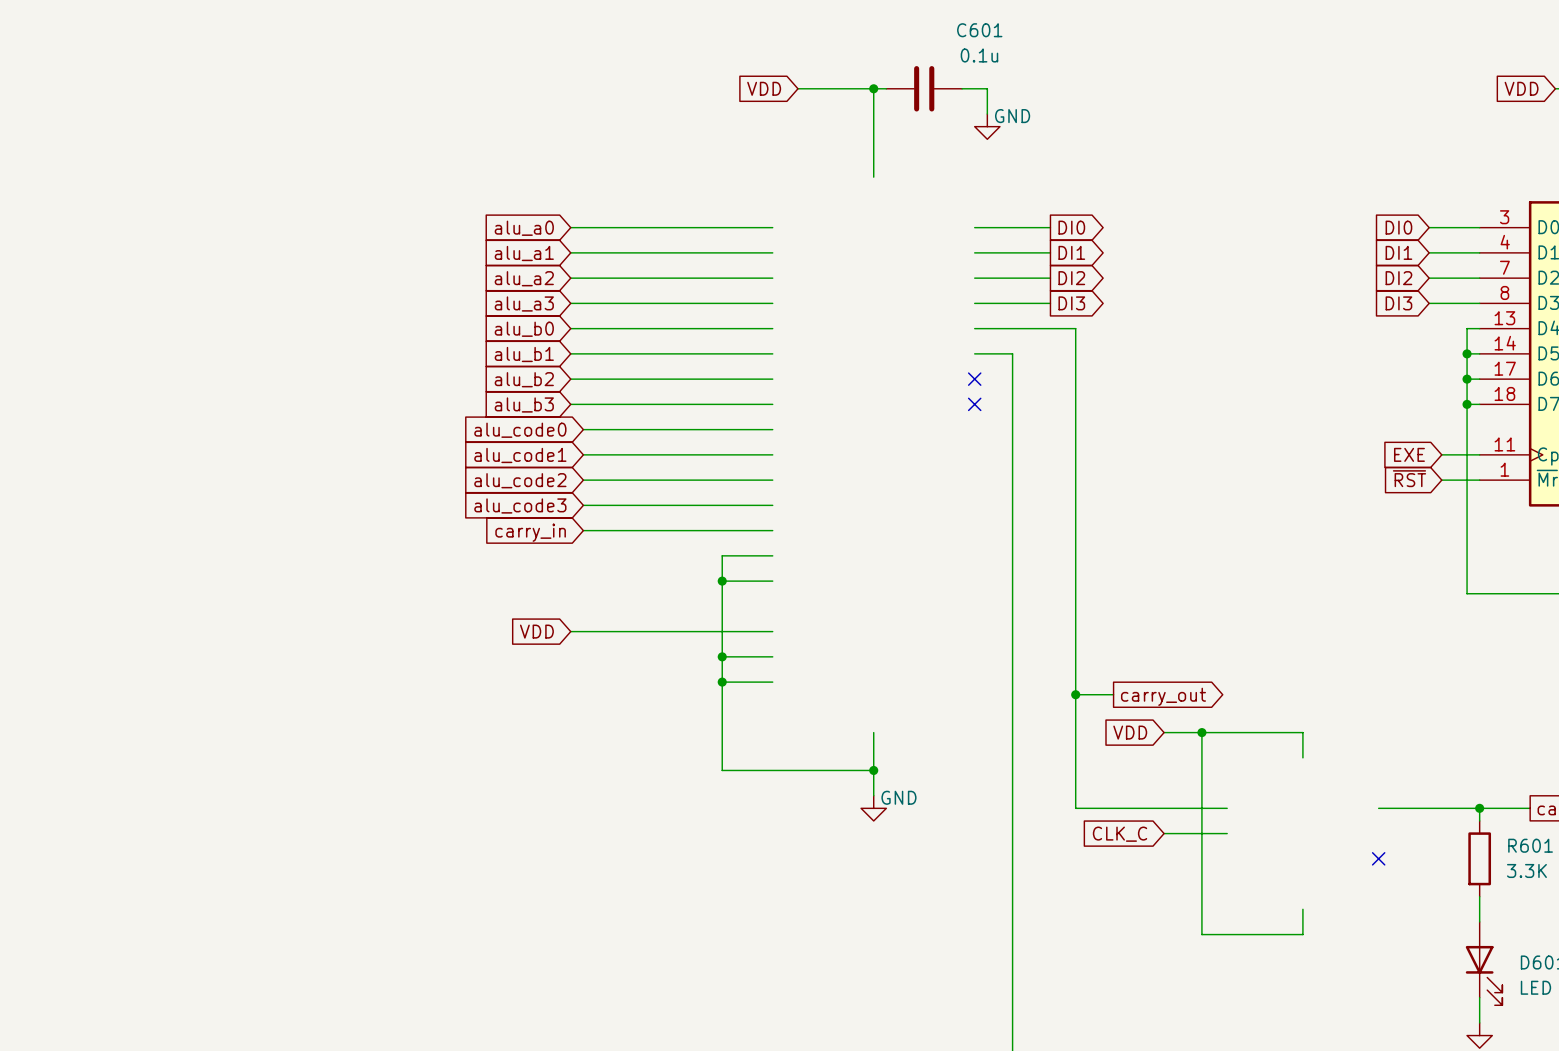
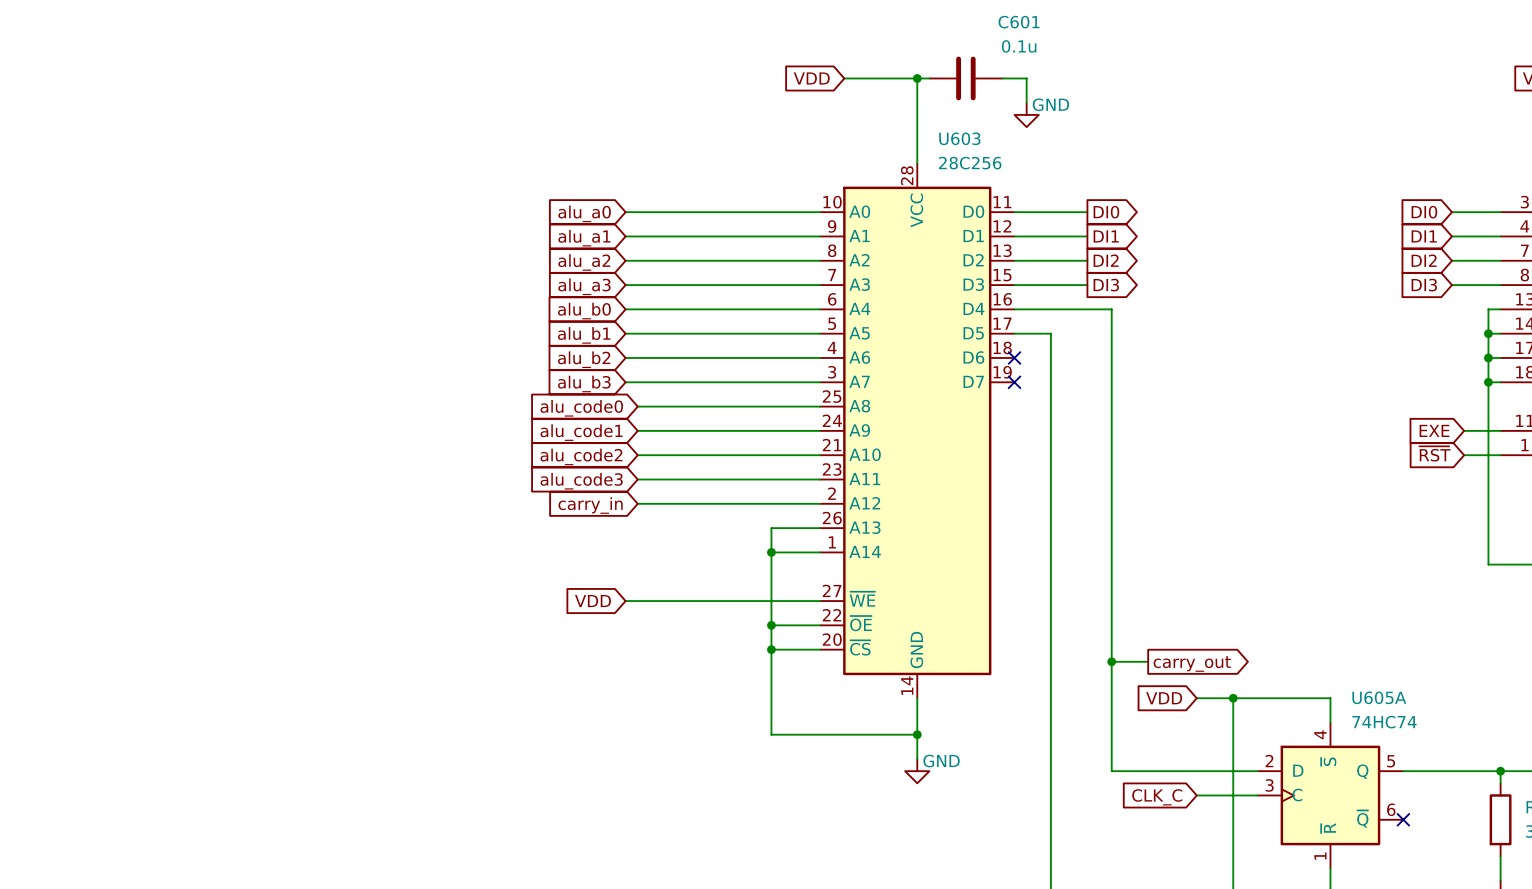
U603: none -> 28C256 (917, 430)
U605A: none -> 74HC74 (1330, 795)

